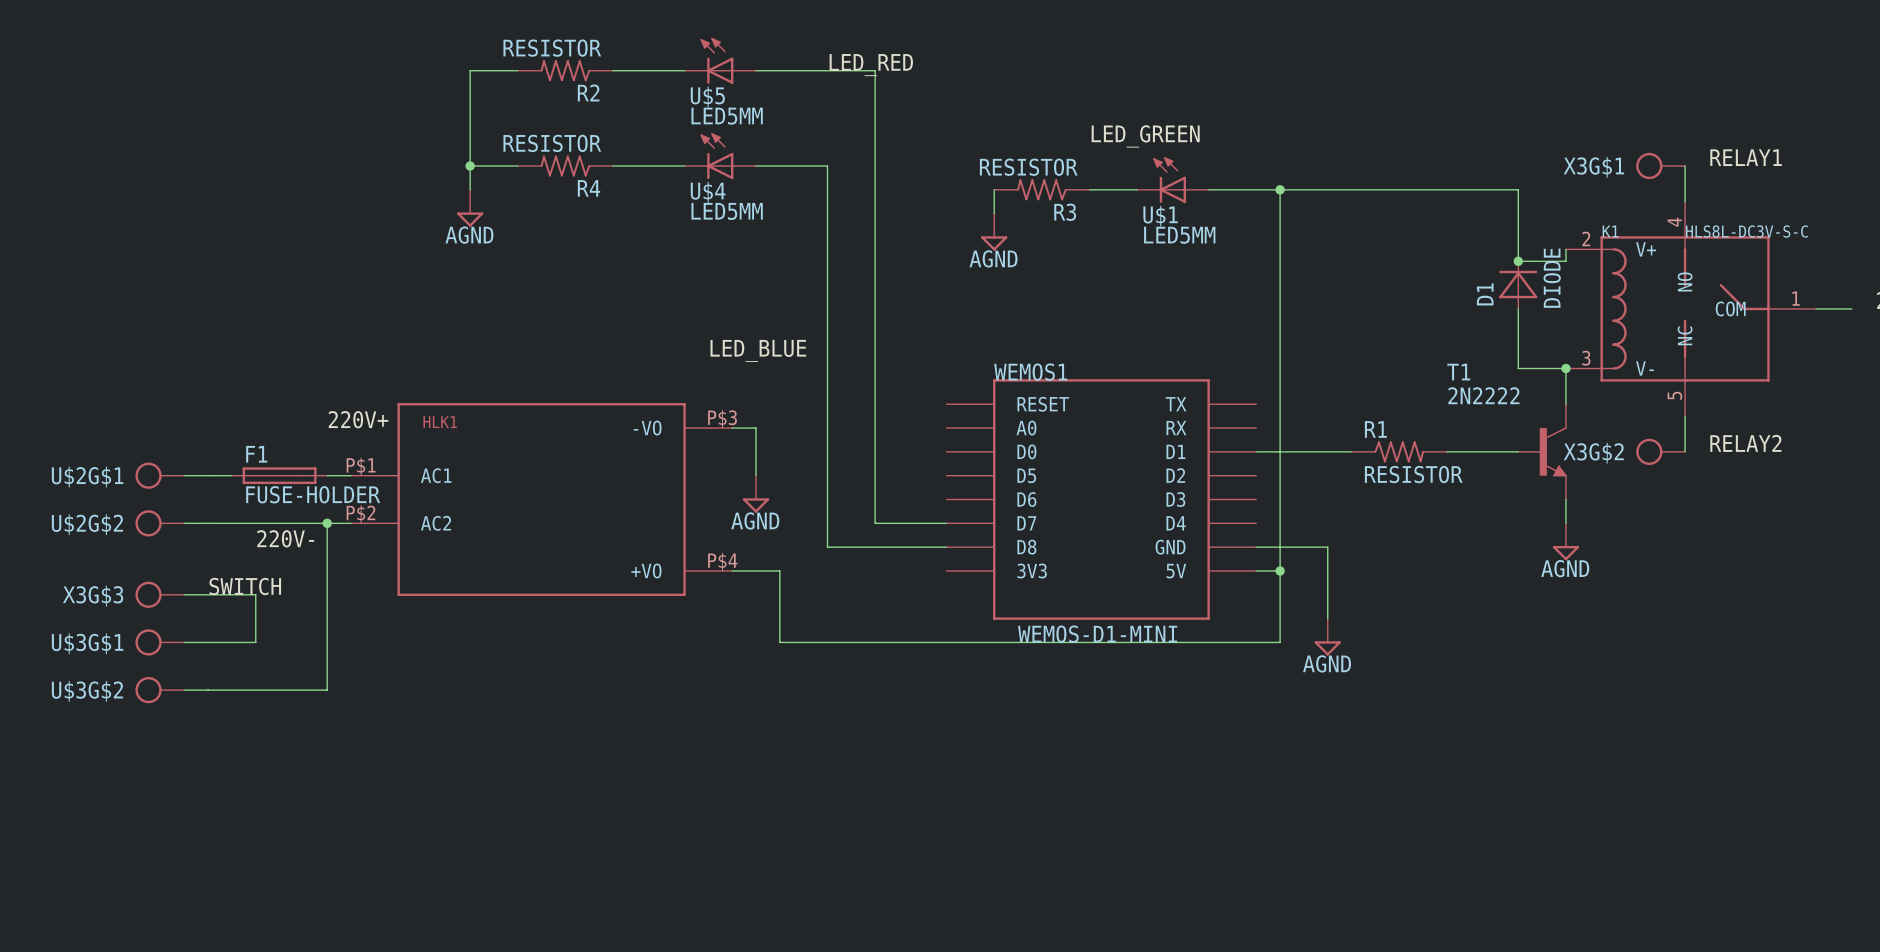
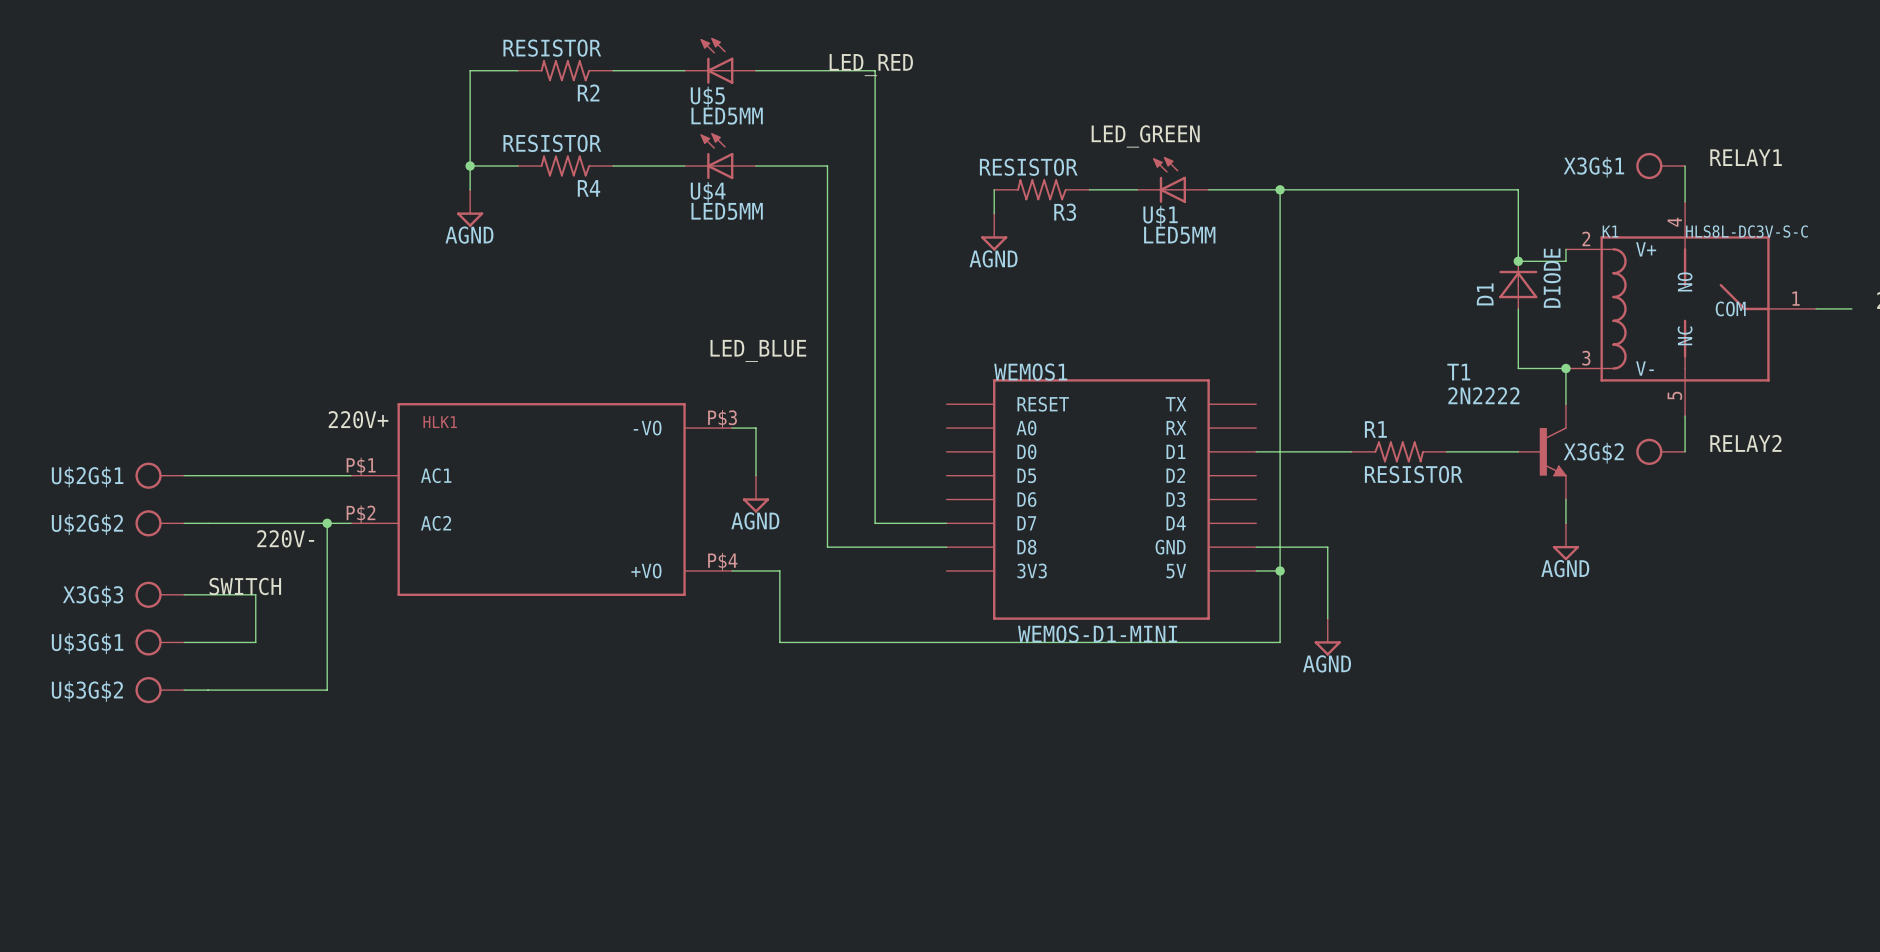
F1: FUSE-HOLDER (279, 475) -> none

